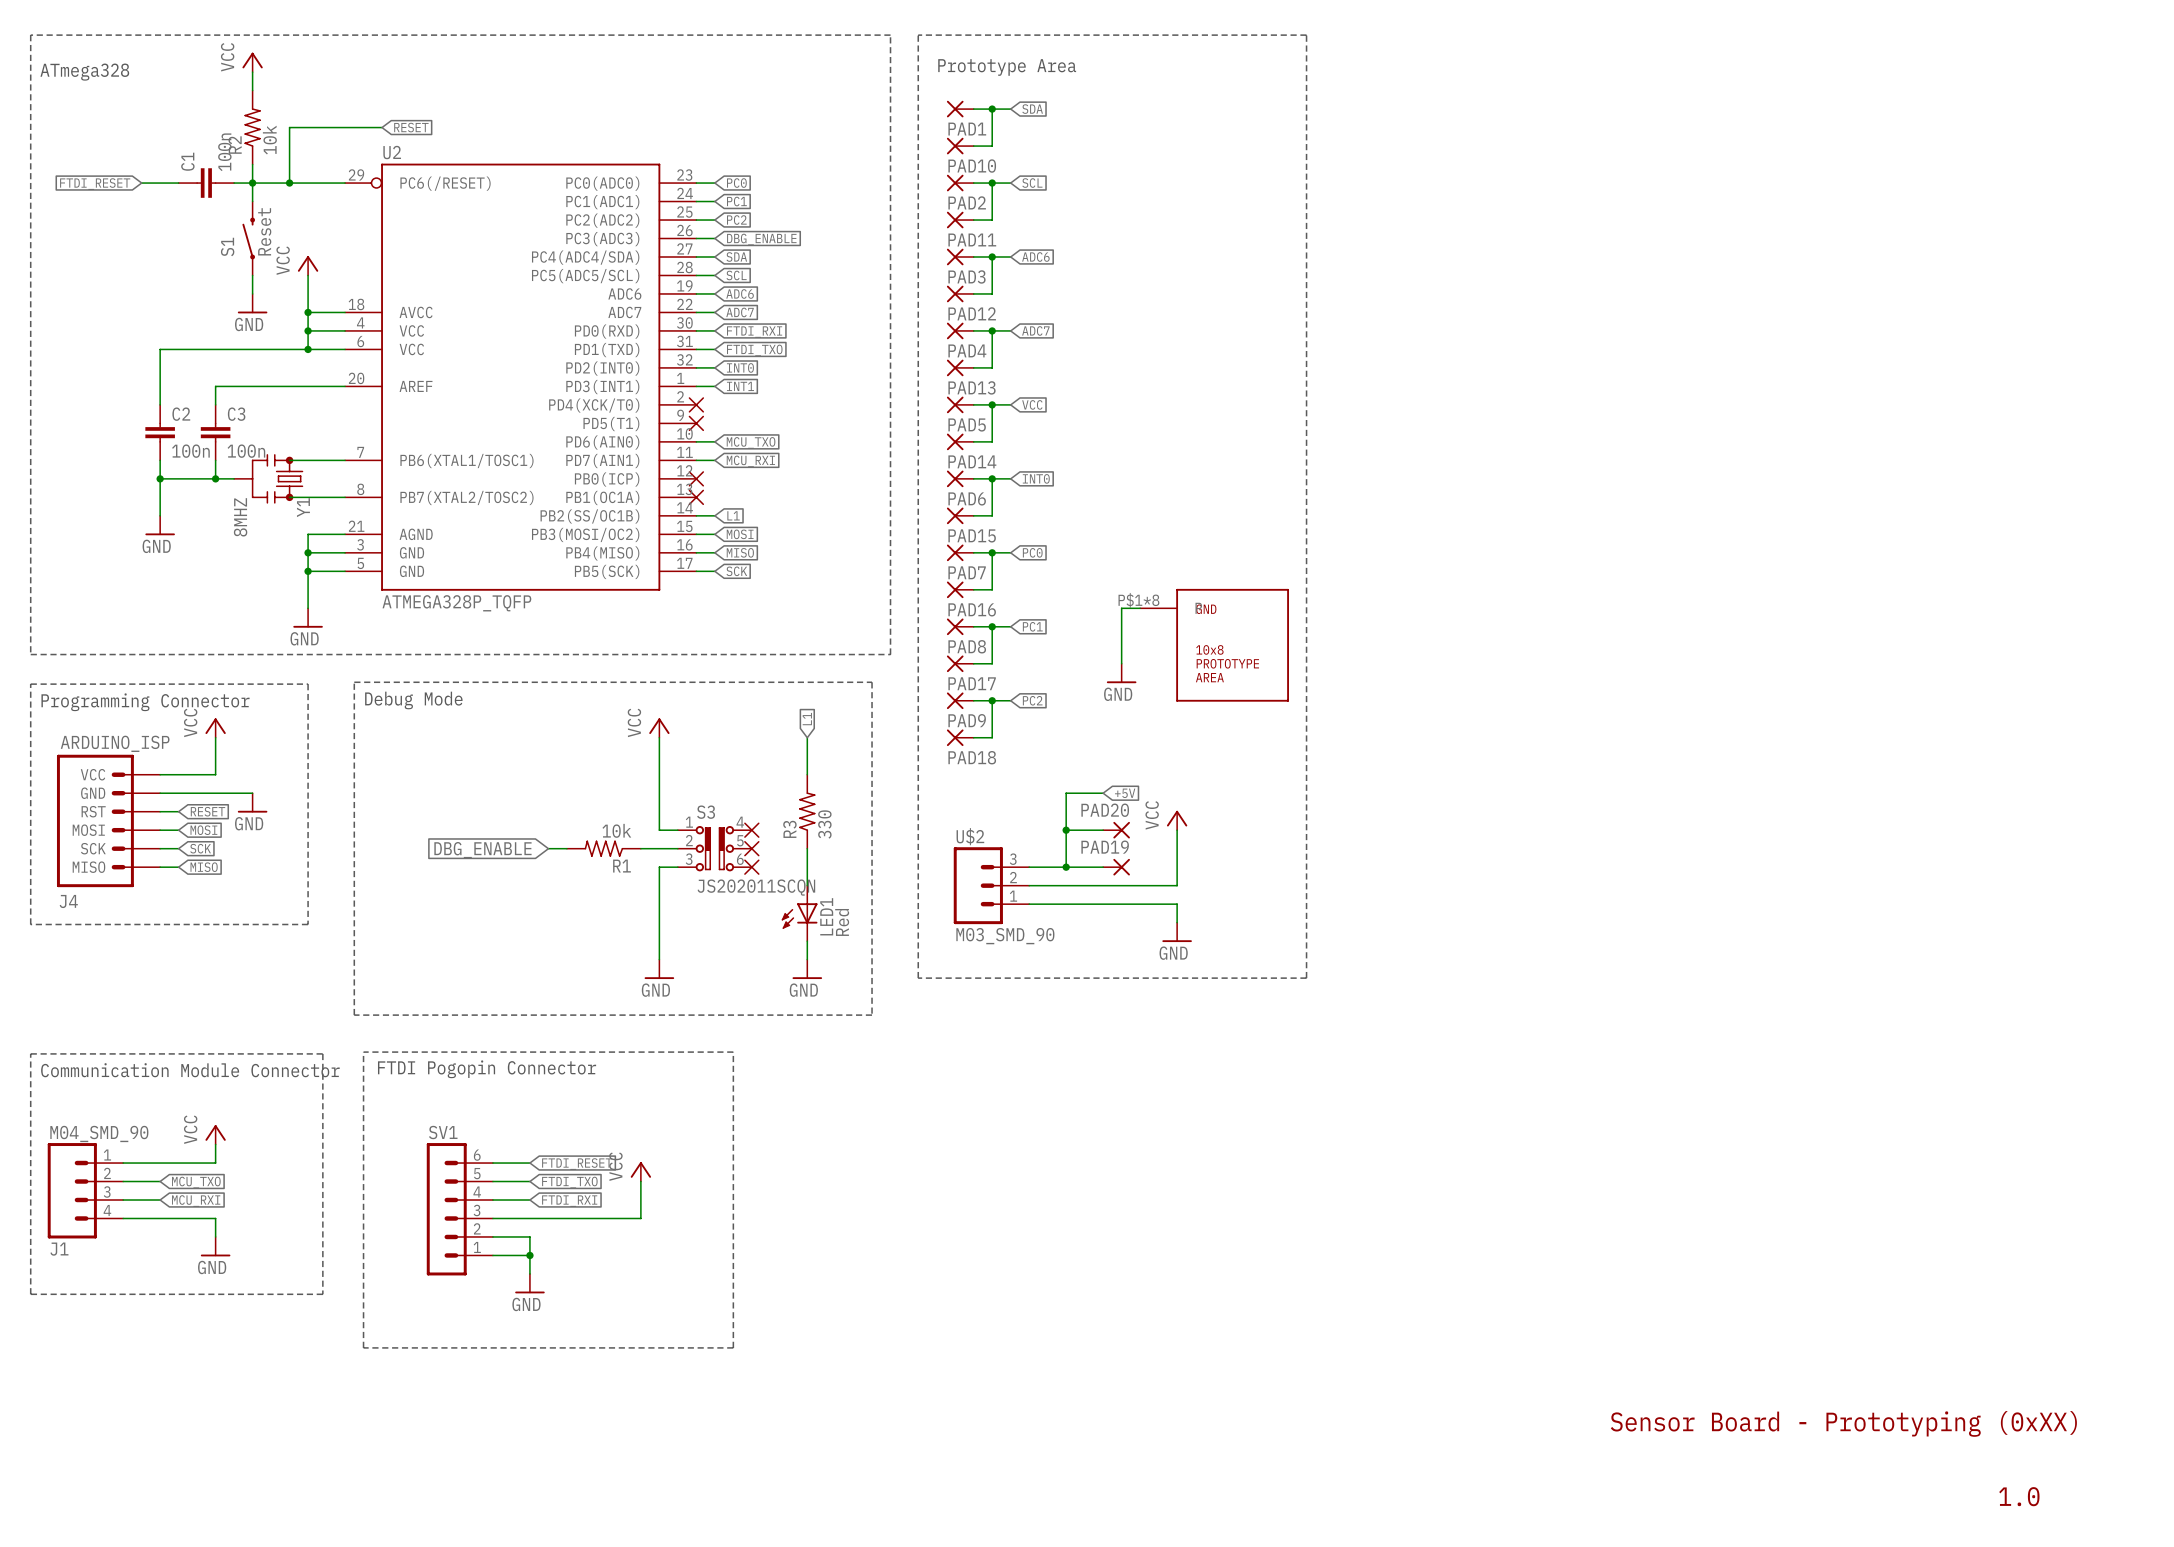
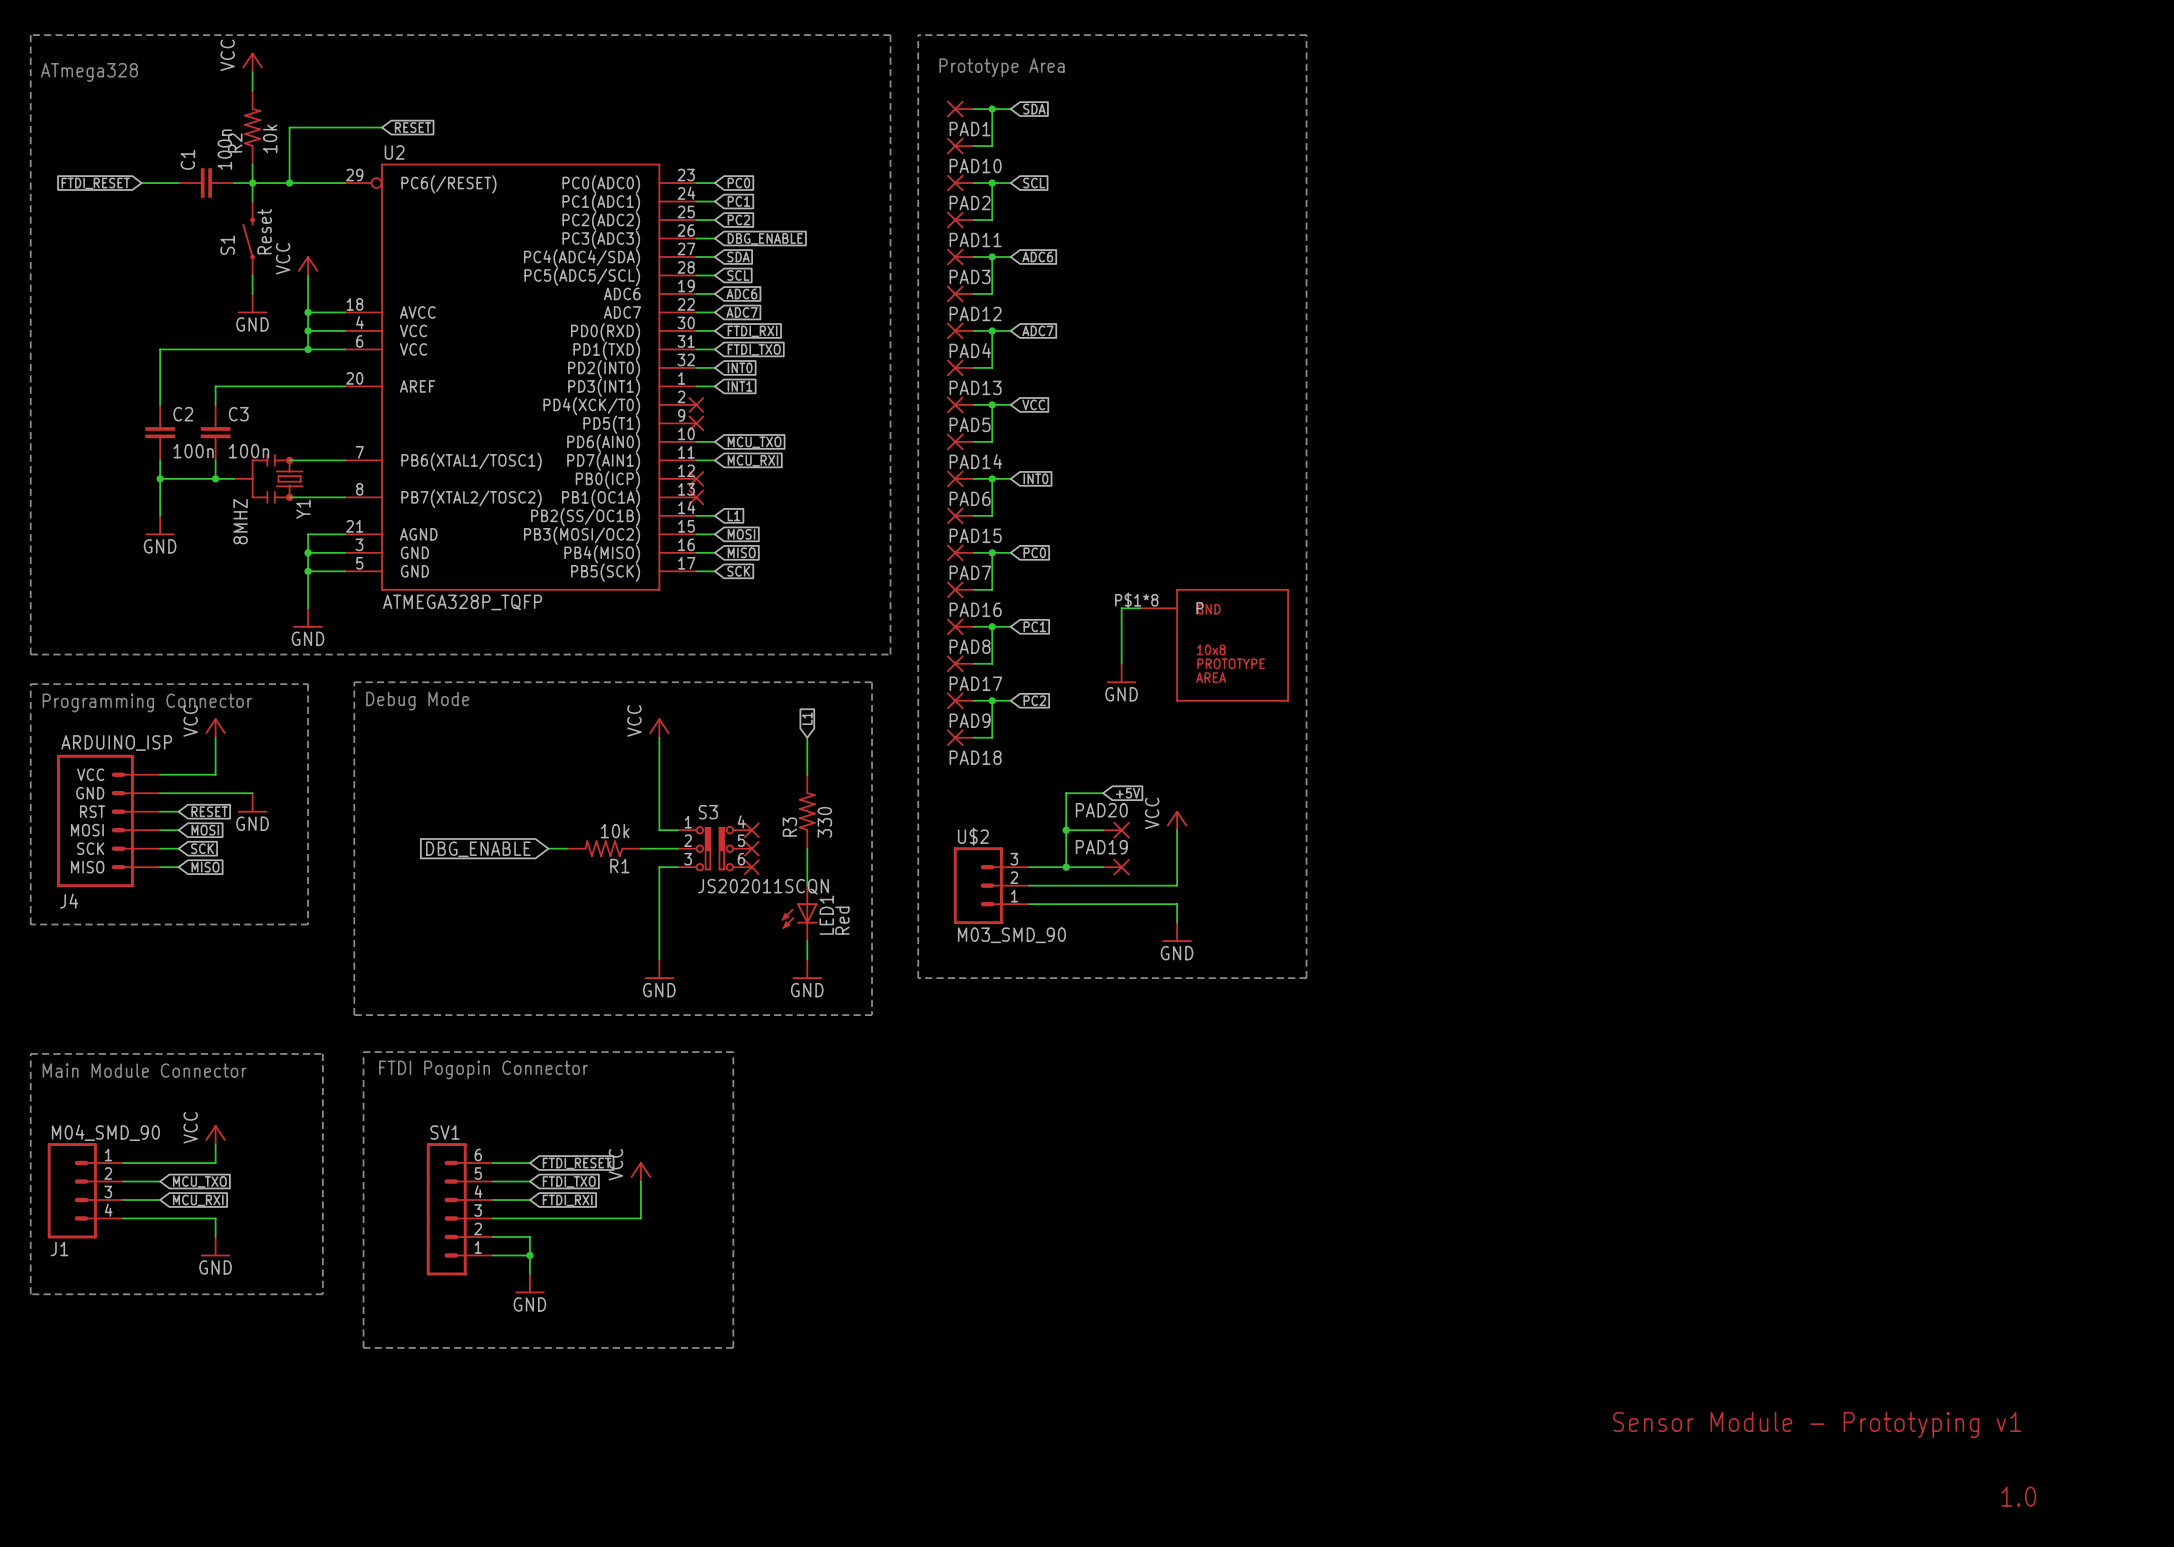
text: Communication Module Connector (190, 1070) -> Main Module Connector (144, 1070)
text: Sensor Board - Prototyping (0xXX) (1843, 1423) -> Sensor Module - Prototyping v1 (1817, 1425)

